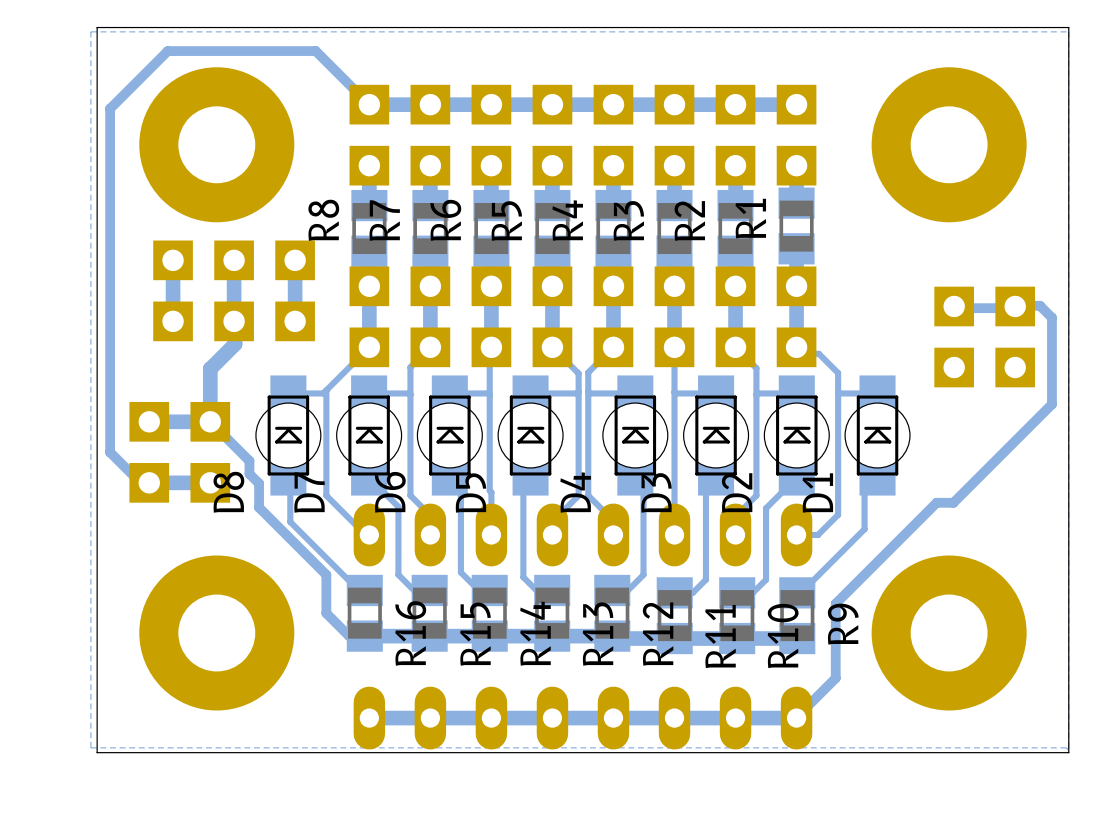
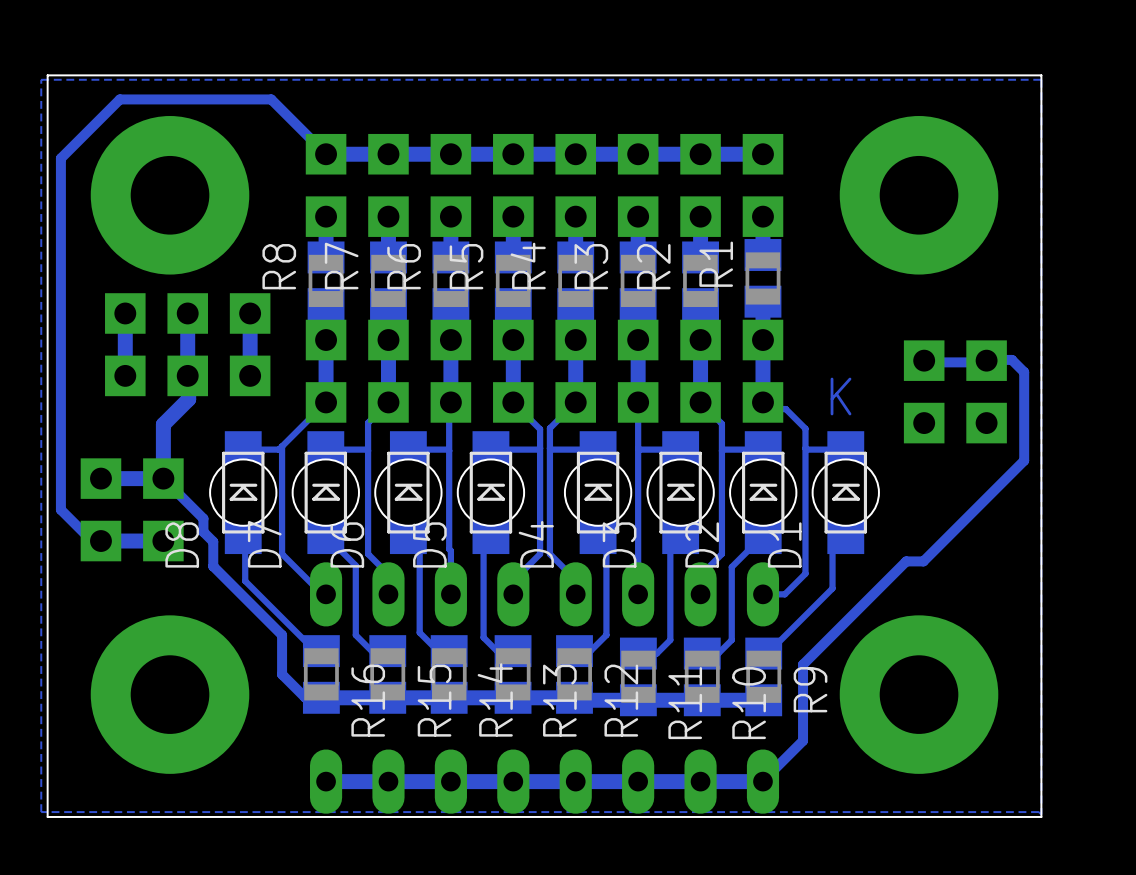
text: none -> K (841, 396)

